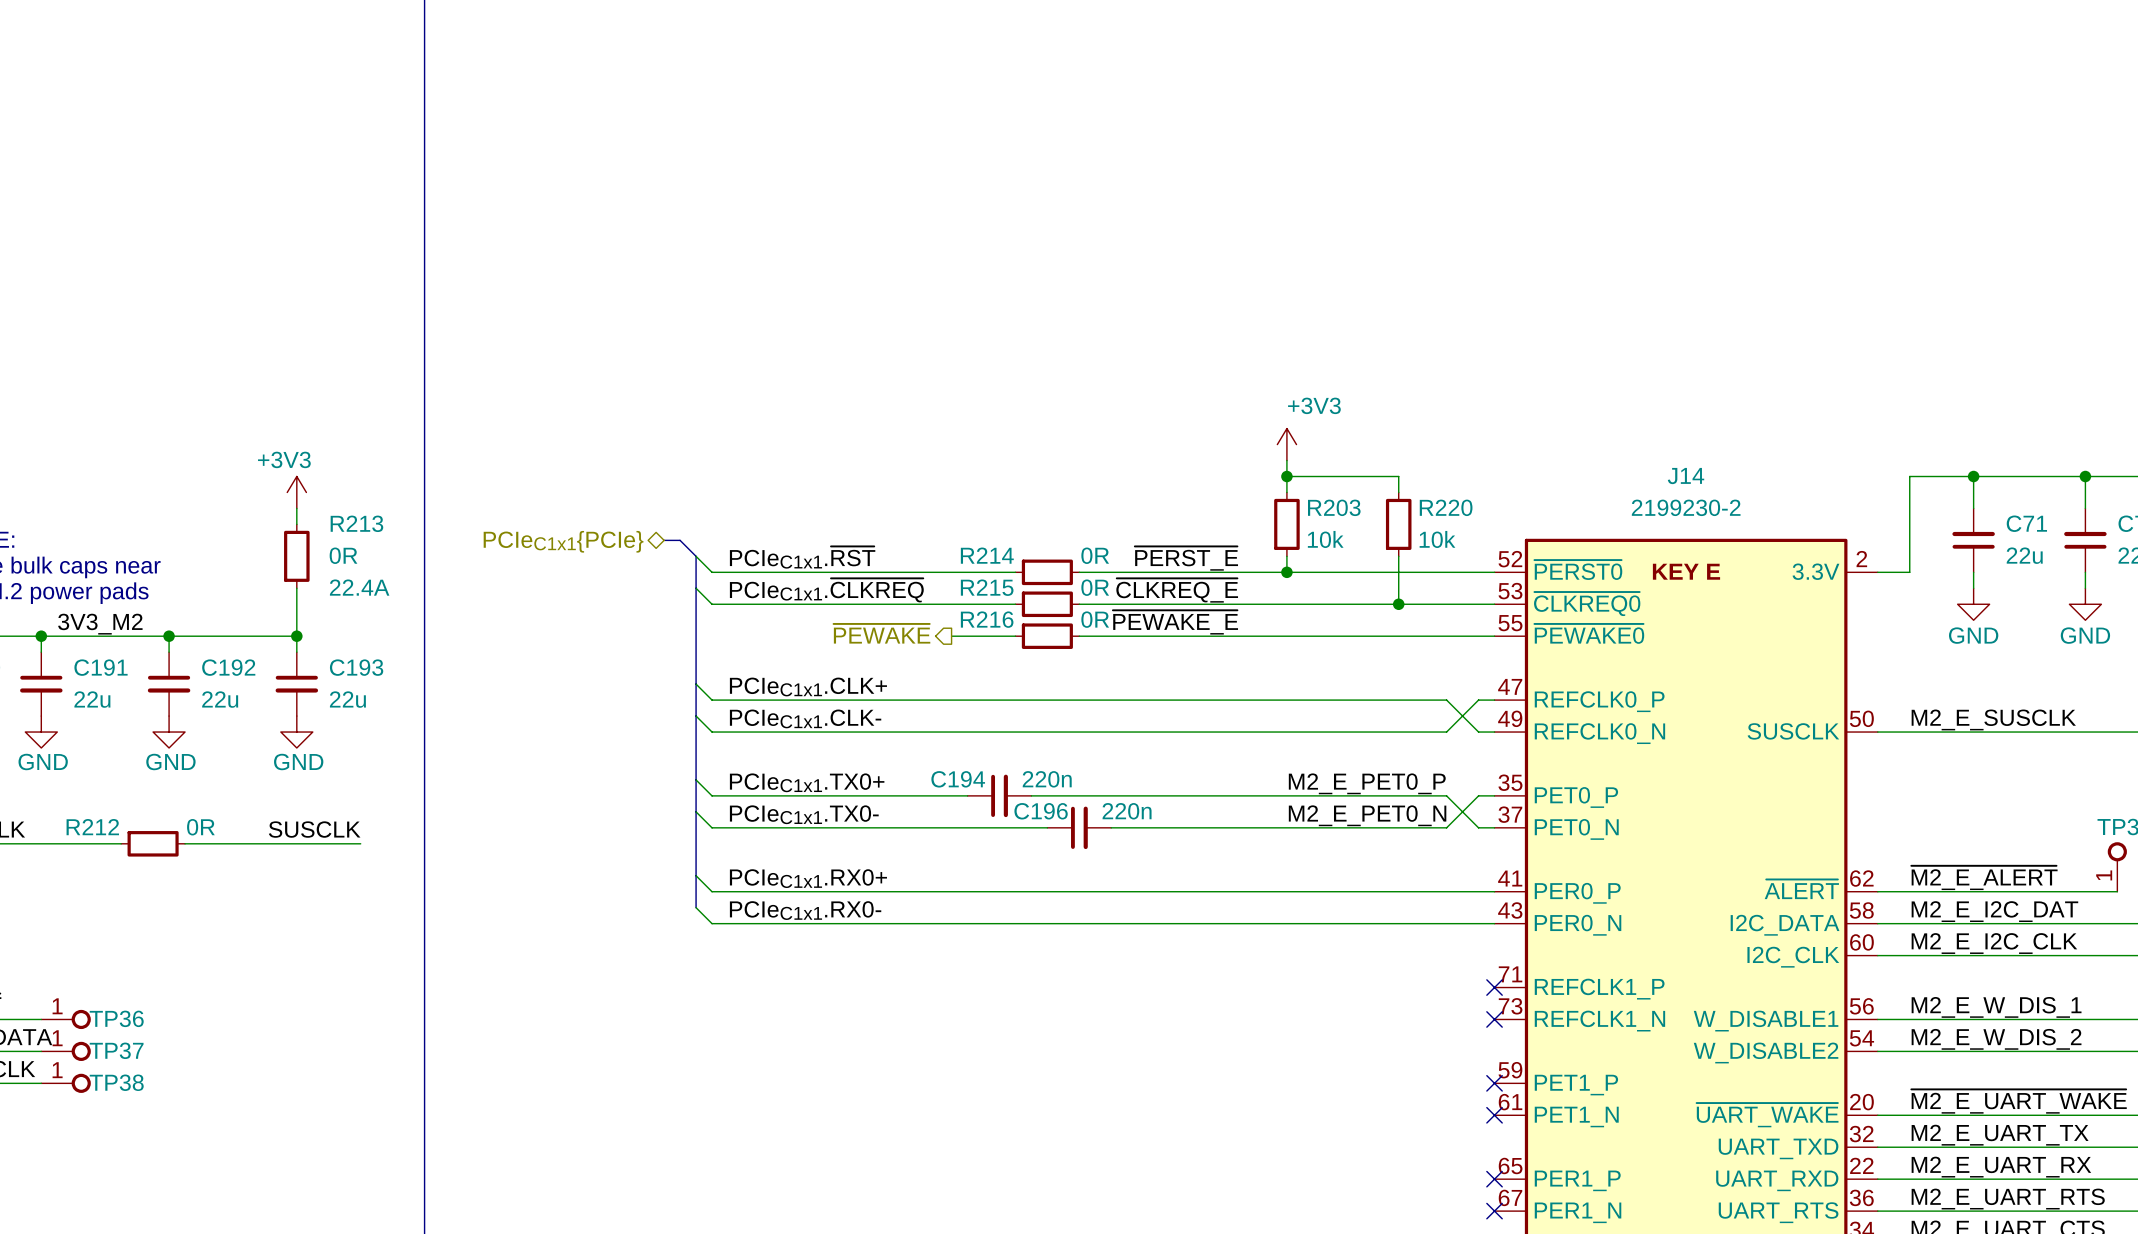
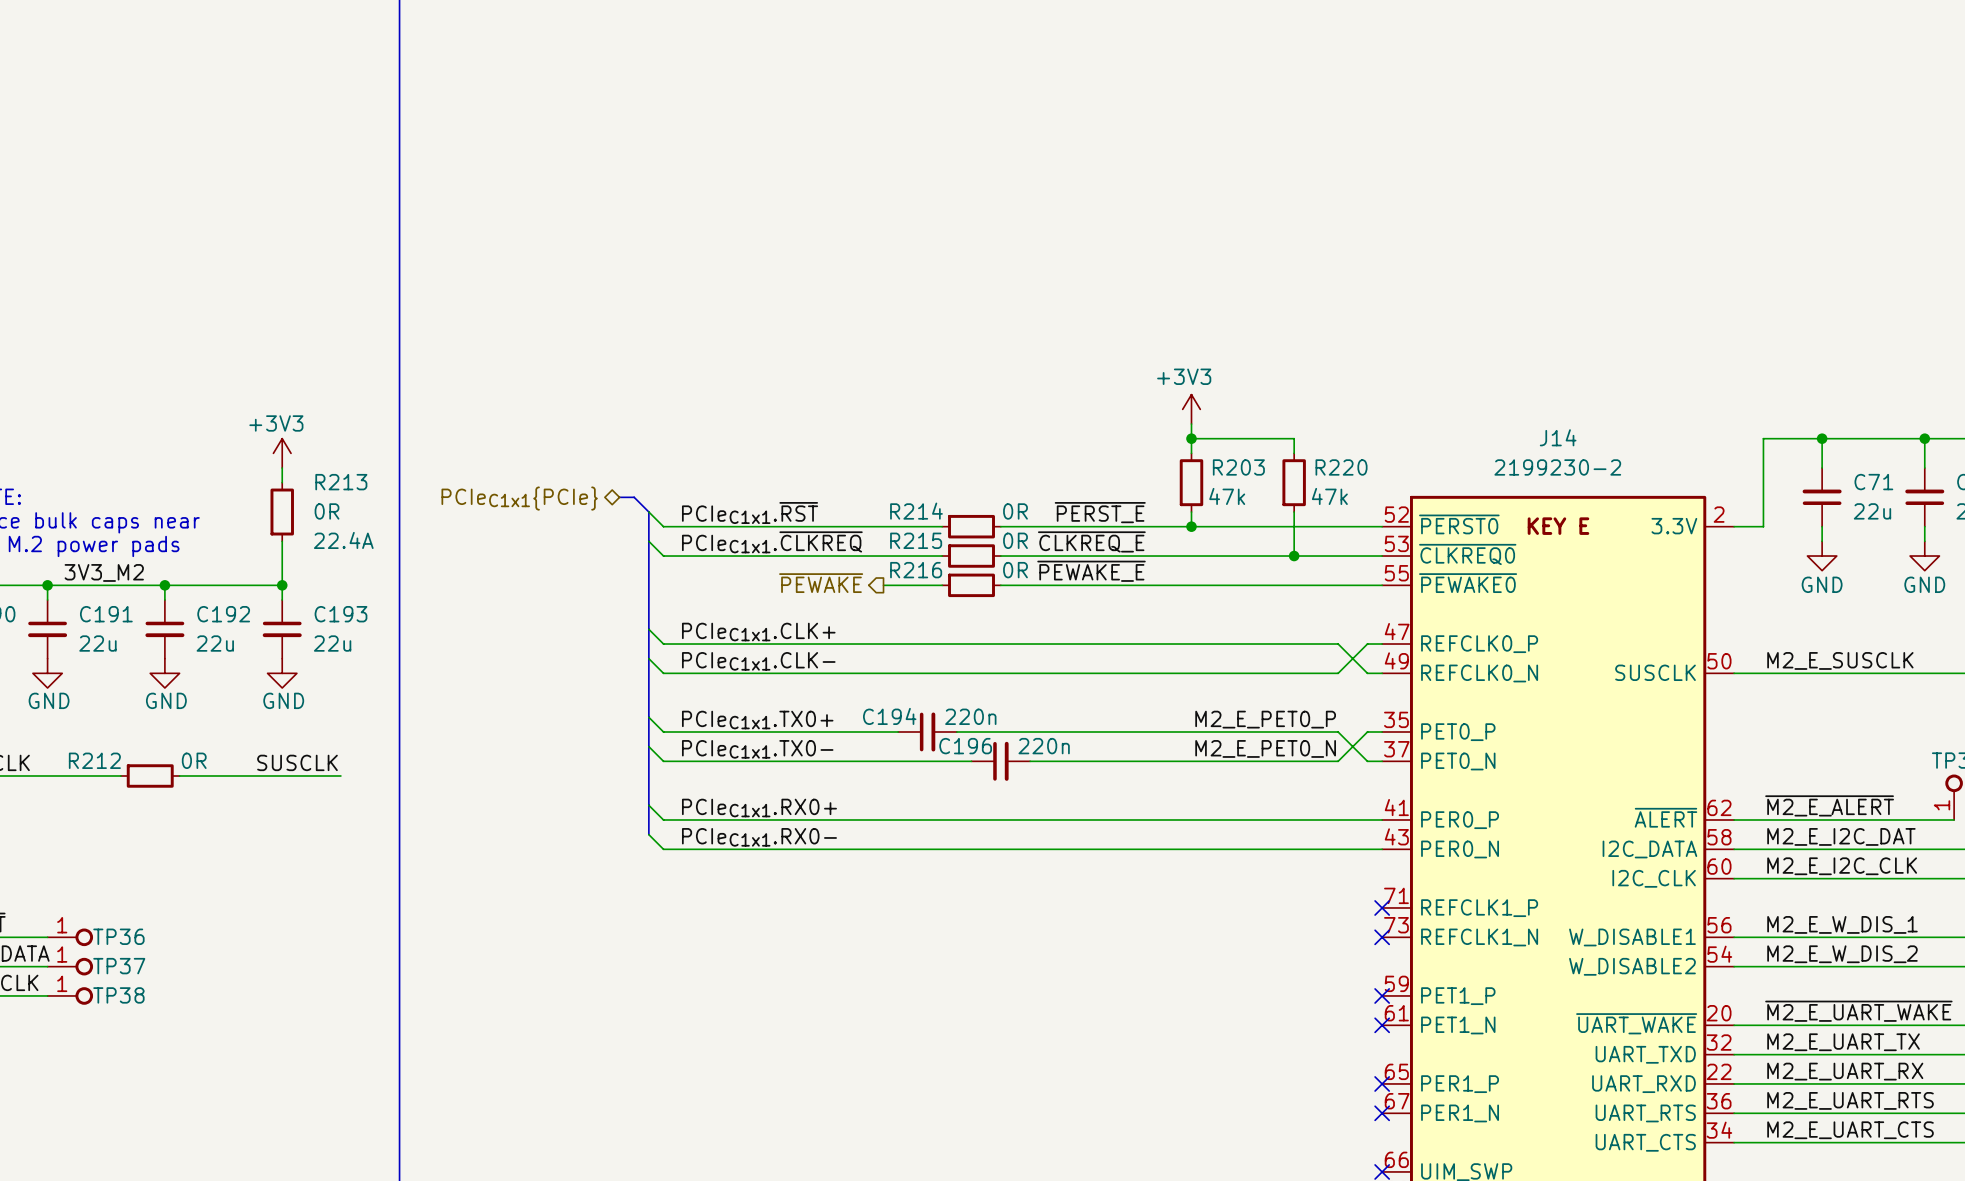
power symbol text position: +3V3 (1314, 405) -> +3V3 (1184, 376)
R203 text: 10k (1325, 539) -> 47k (1227, 496)
R220 text: 10k (1437, 539) -> 47k (1329, 496)

